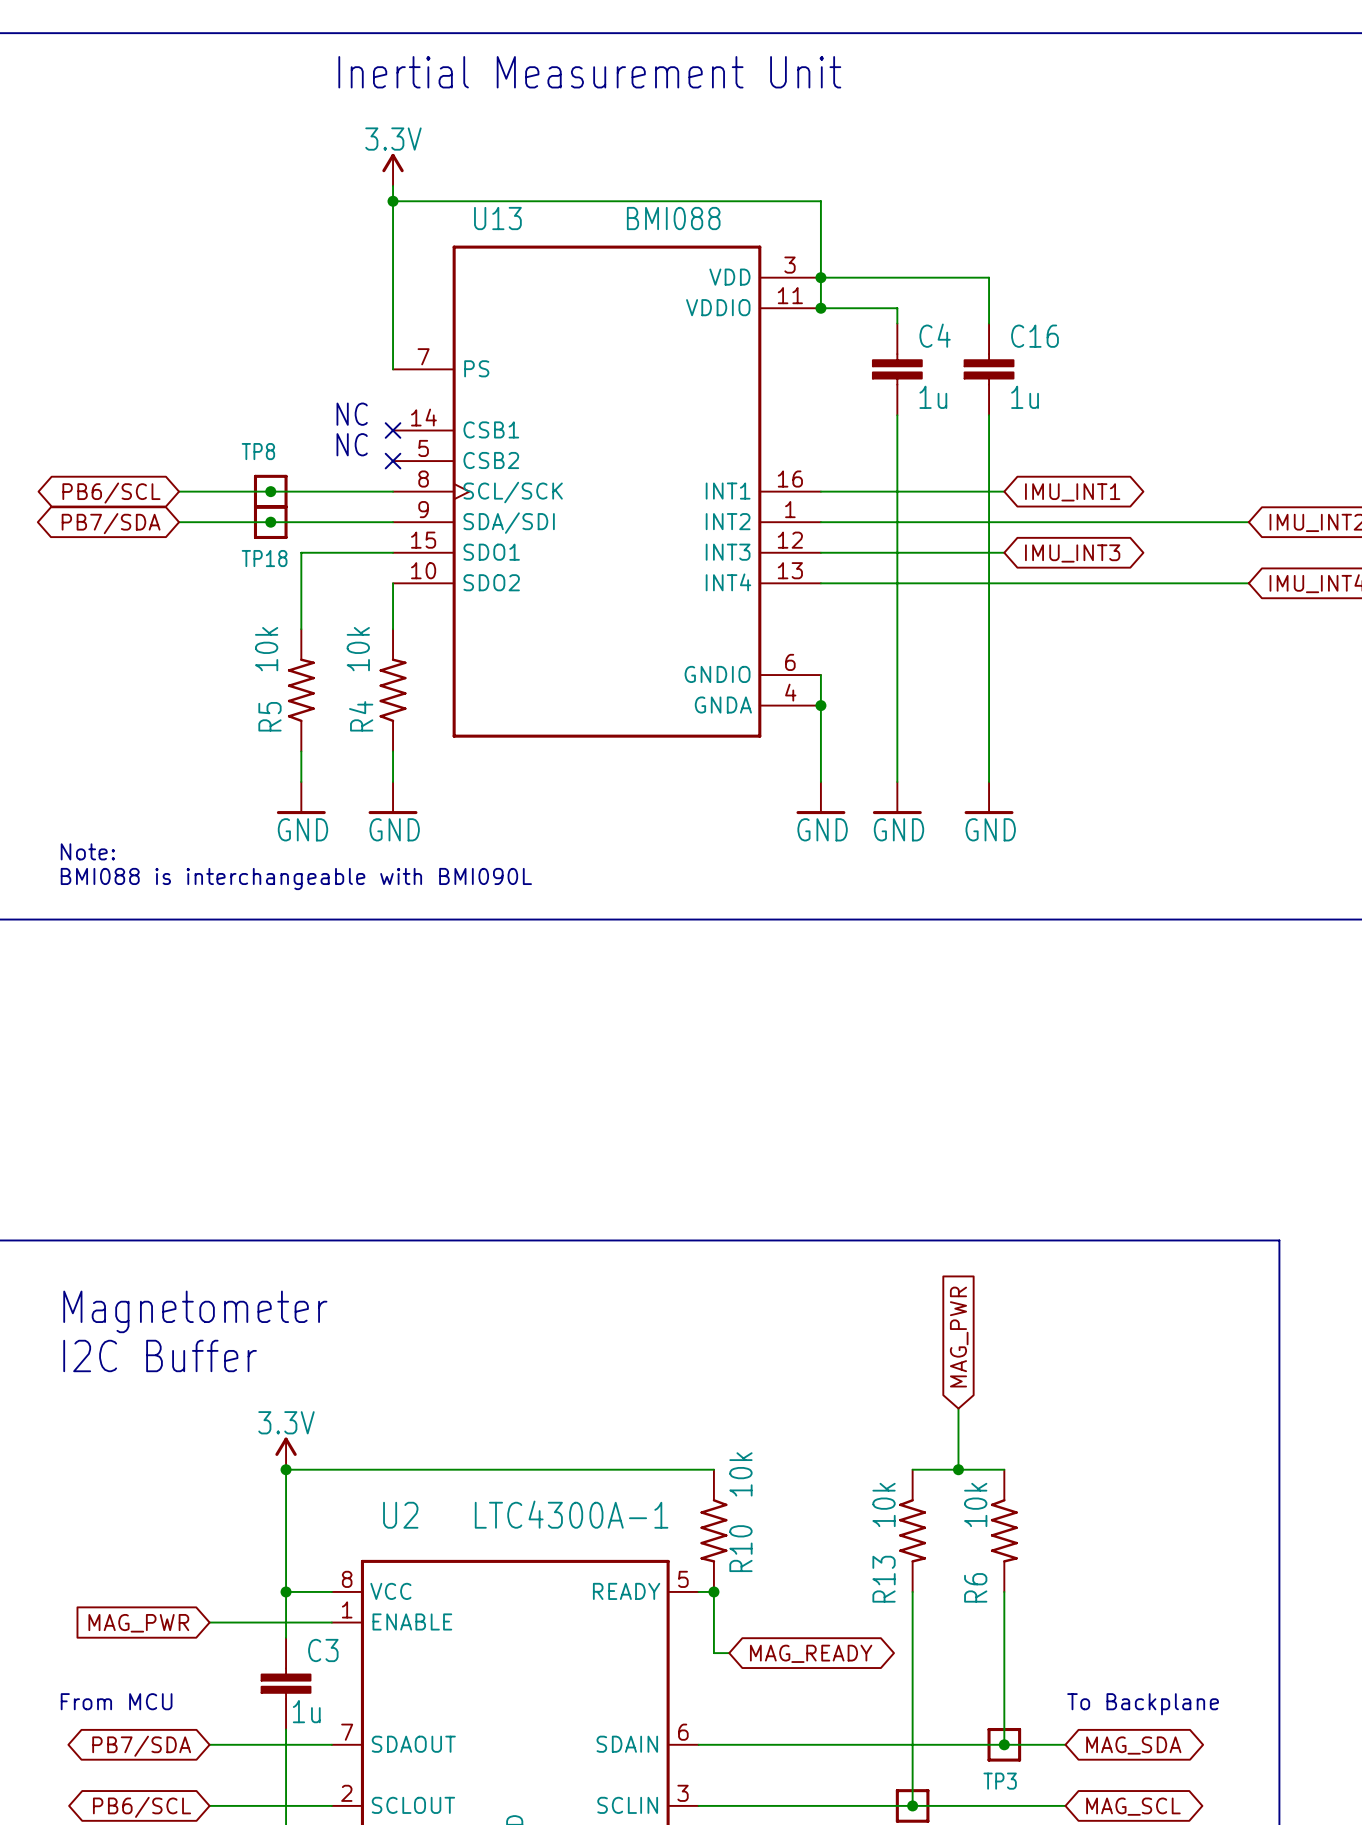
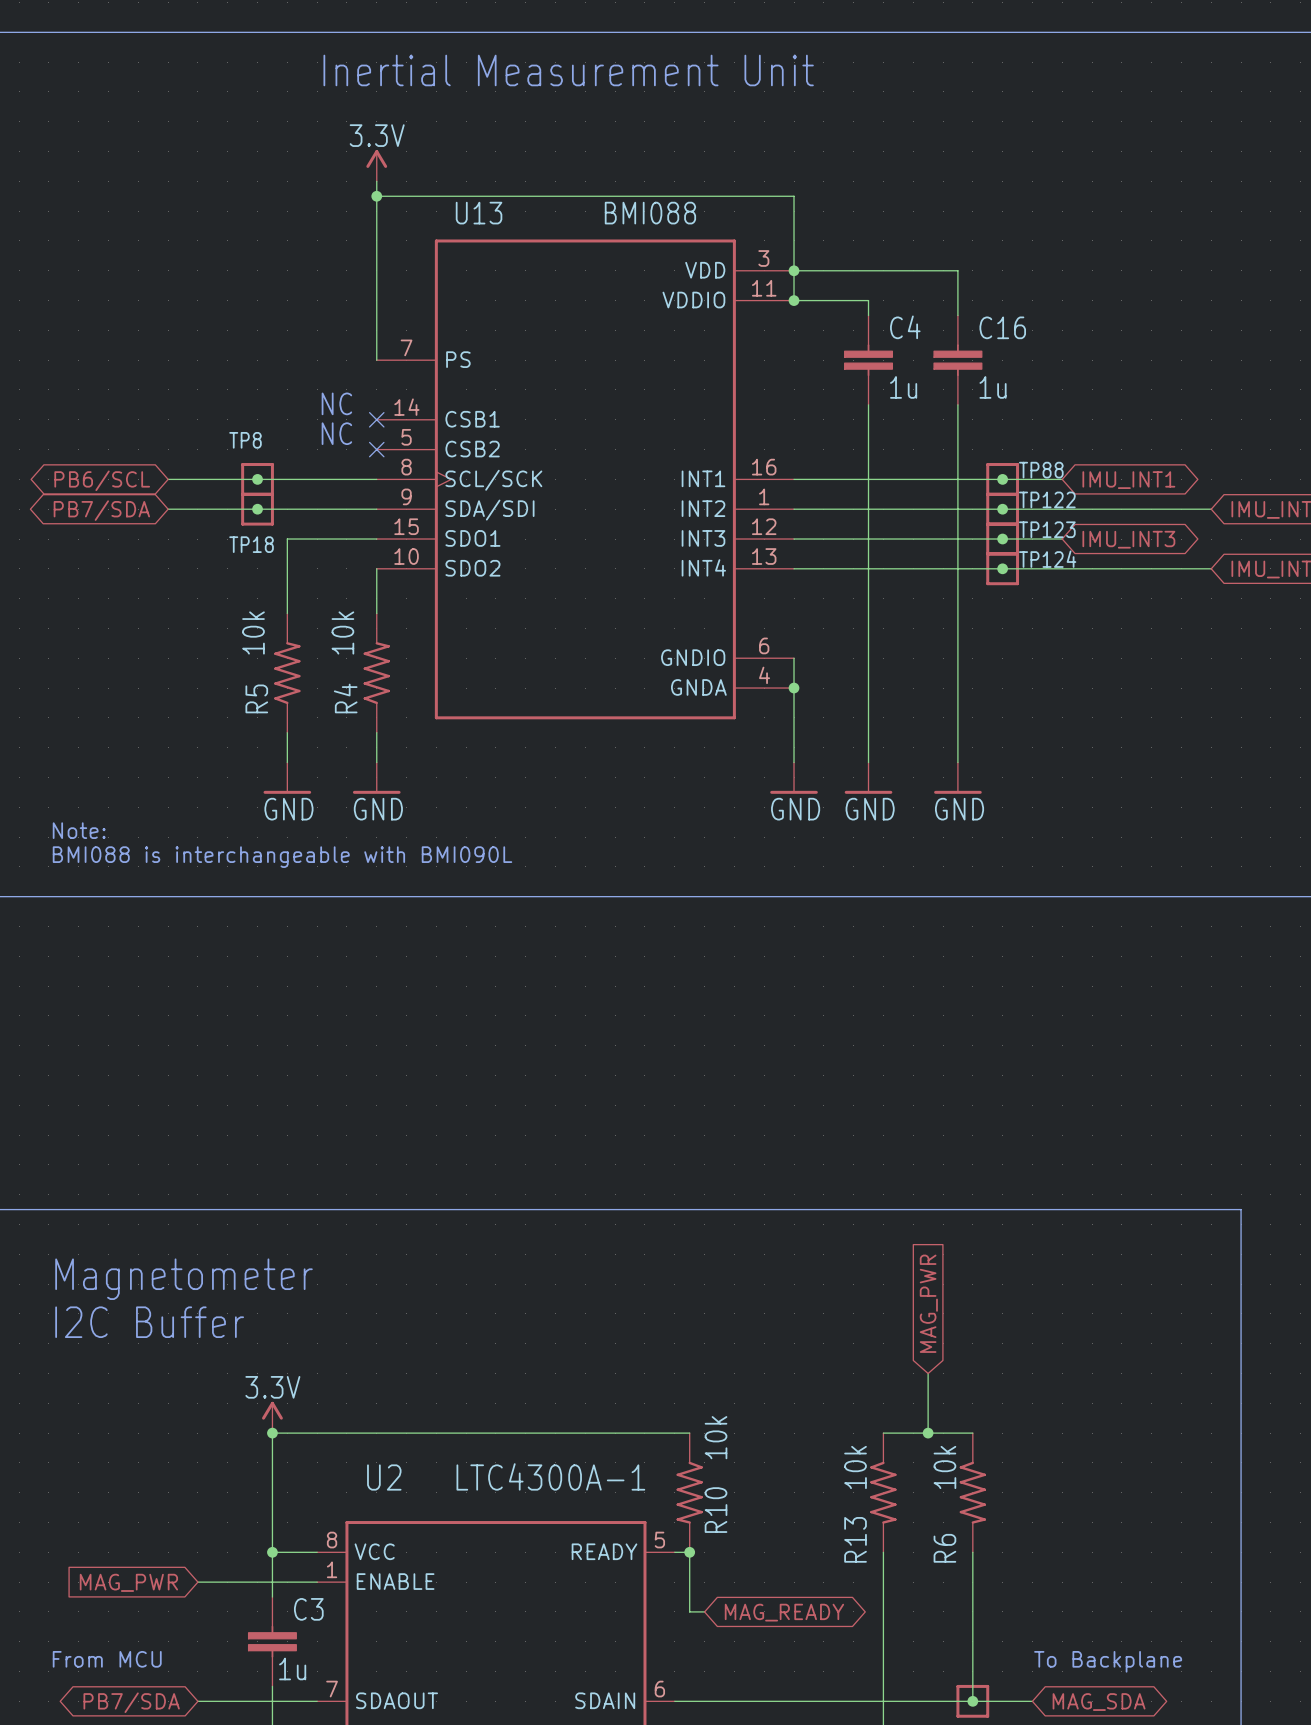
wire: none -> (972, 479) (1062, 479)
junction: none -> (1002, 479)
TP88: none -> (1002, 479)
global label position: IMU_INT1 (1072, 492) -> IMU_INT1 (1128, 480)
junction: none -> (1002, 509)
TP122: none -> (1002, 509)
wire: none -> (972, 539) (1062, 539)
junction: none -> (1002, 539)
TP123: none -> (1002, 539)
global label position: IMU_INT3 (1072, 553) -> IMU_INT3 (1128, 539)
junction: none -> (1002, 568)
TP124: none -> (1002, 568)

